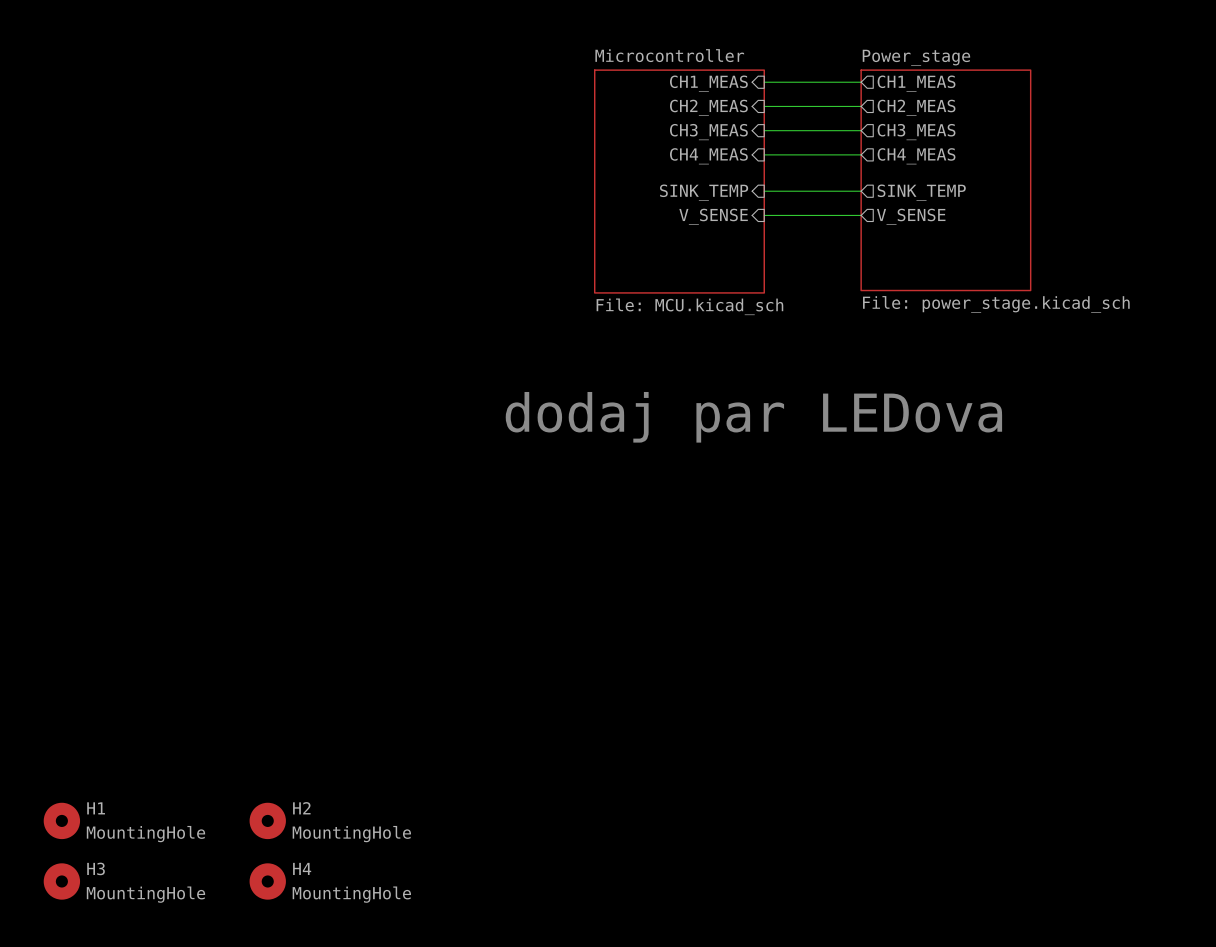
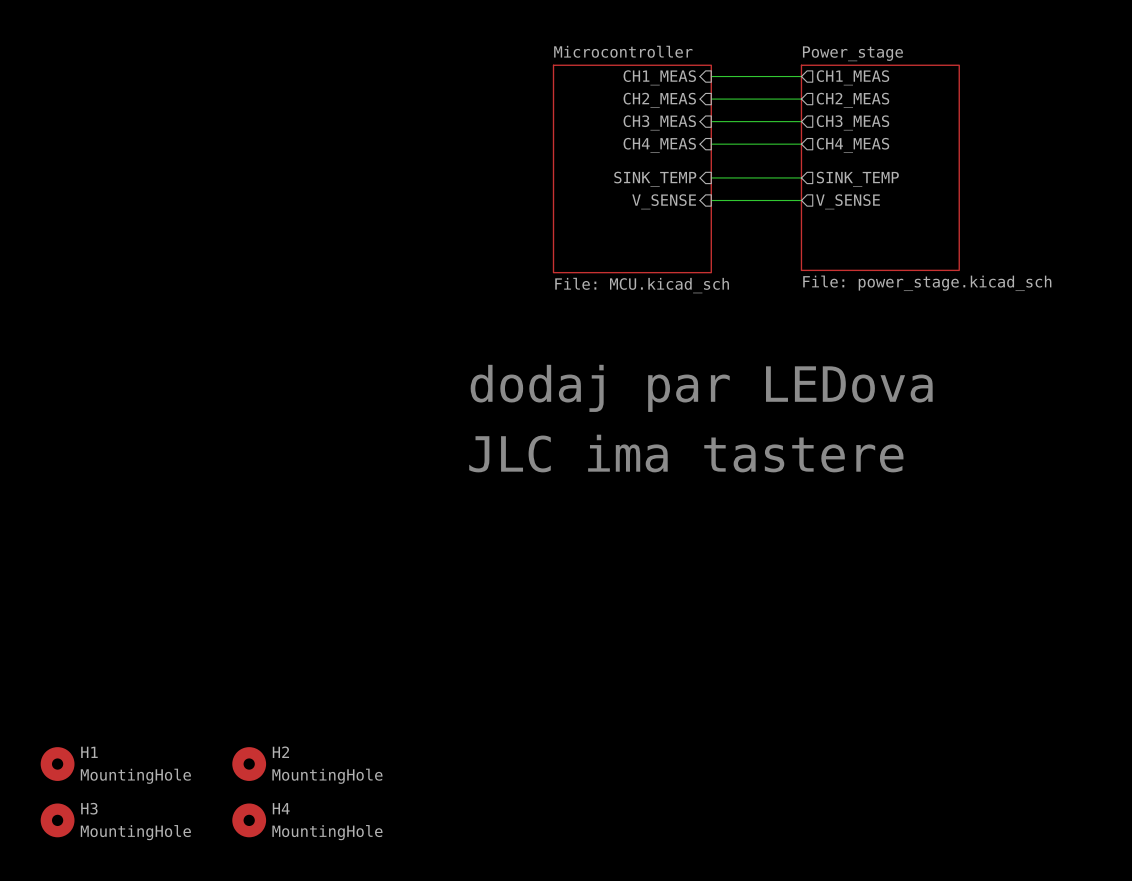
text: none -> JLC ima tastere (686, 453)

